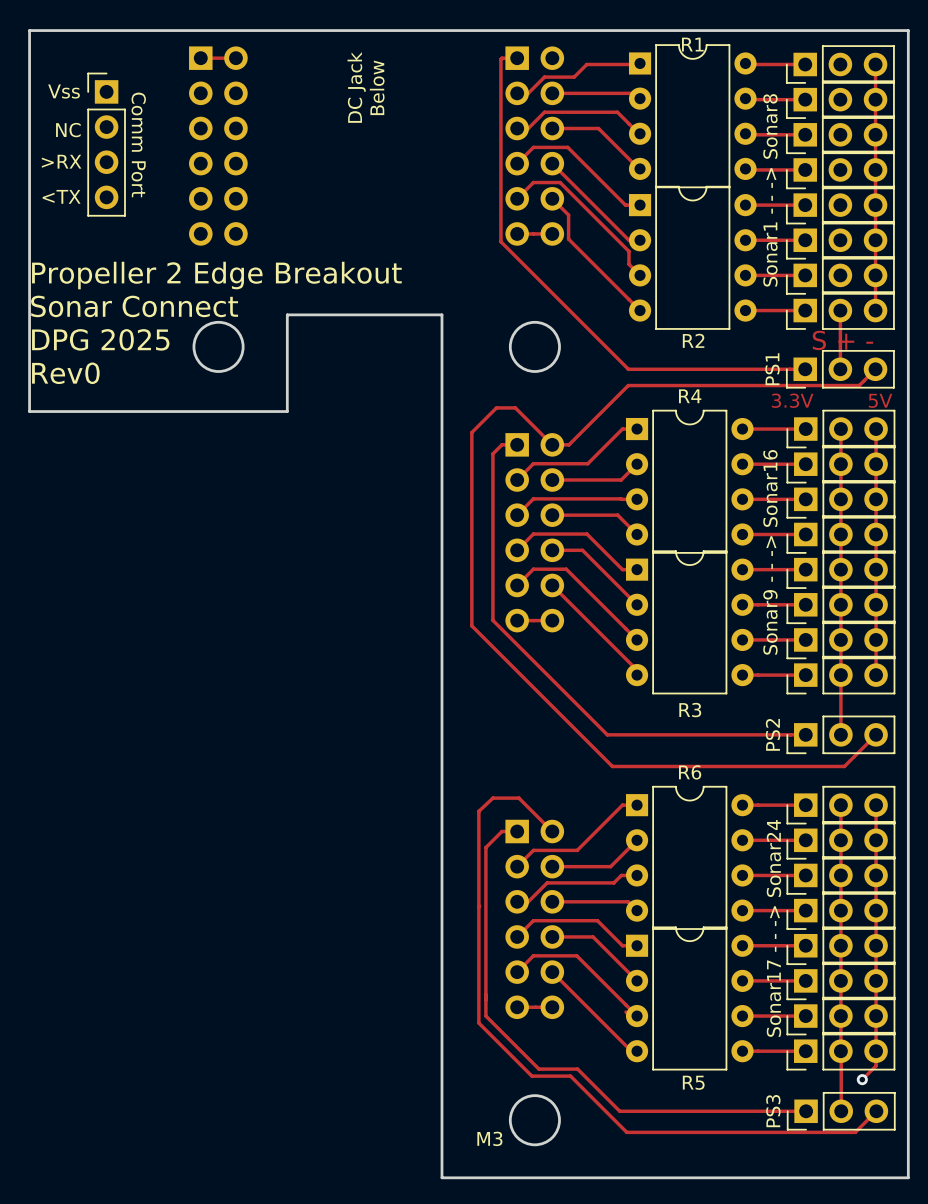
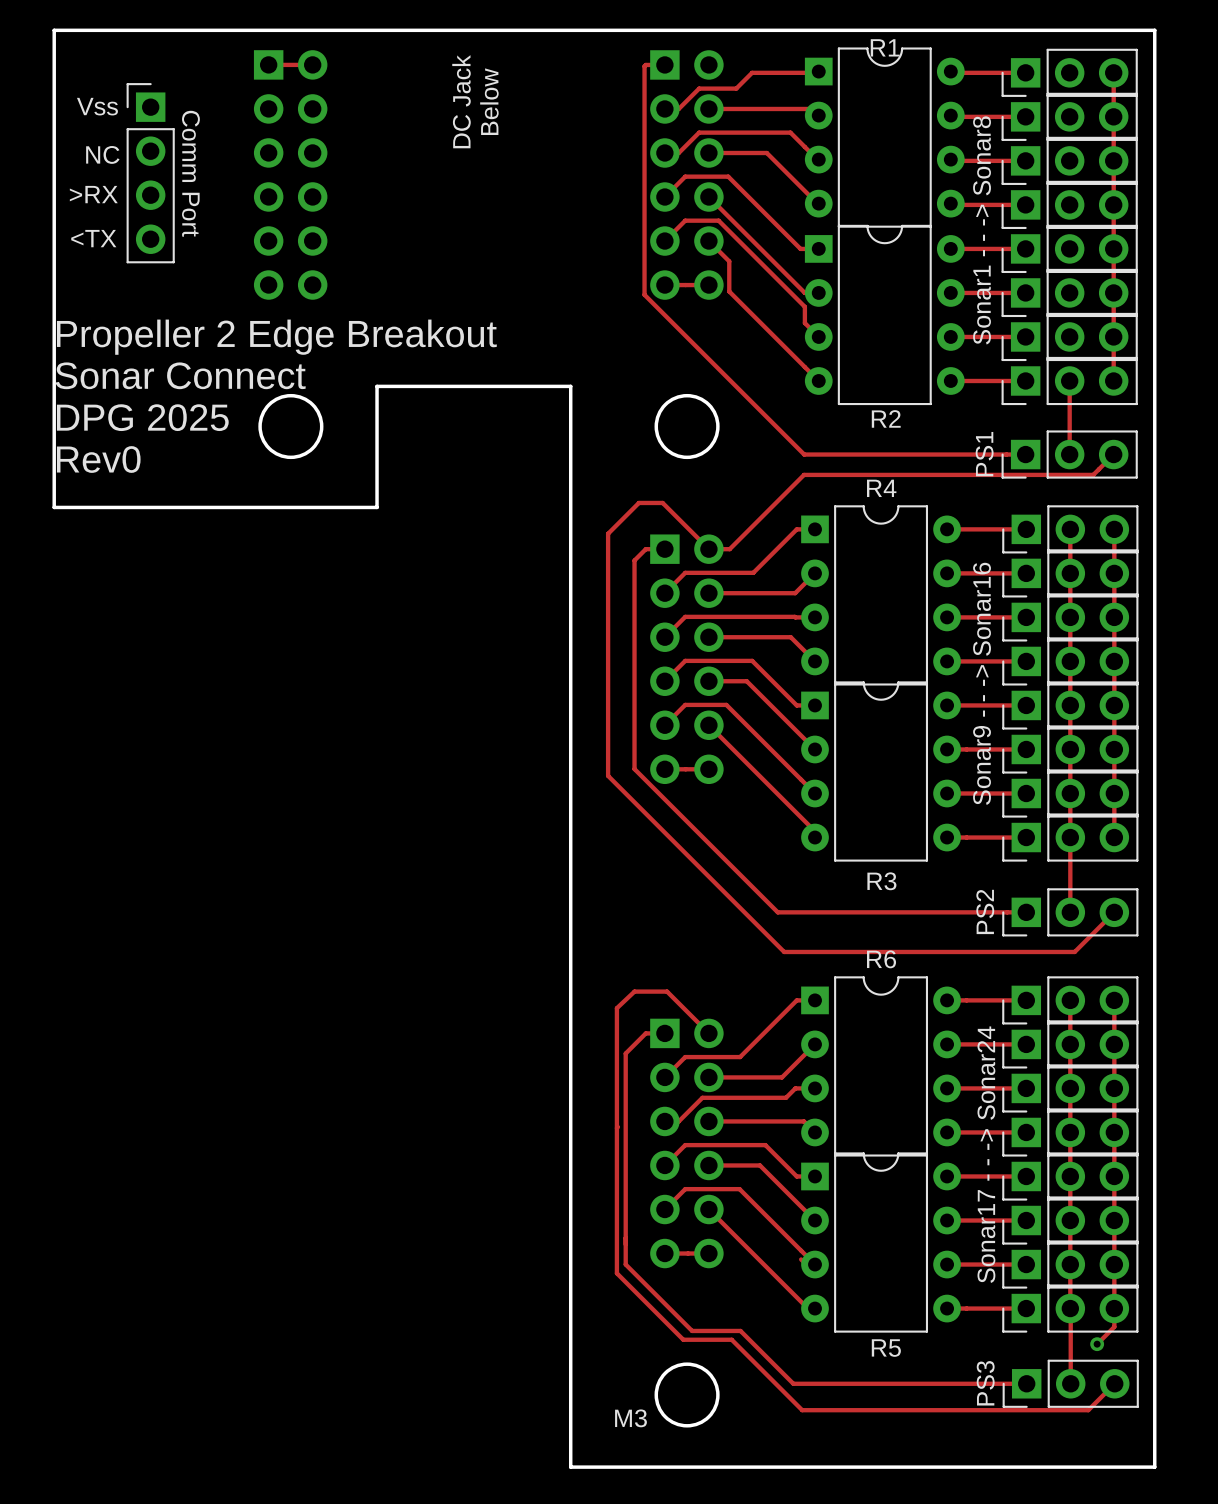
text: S + - (842, 340) -> none
text: 3.3V (792, 400) -> none
text: 5V (880, 400) -> none

